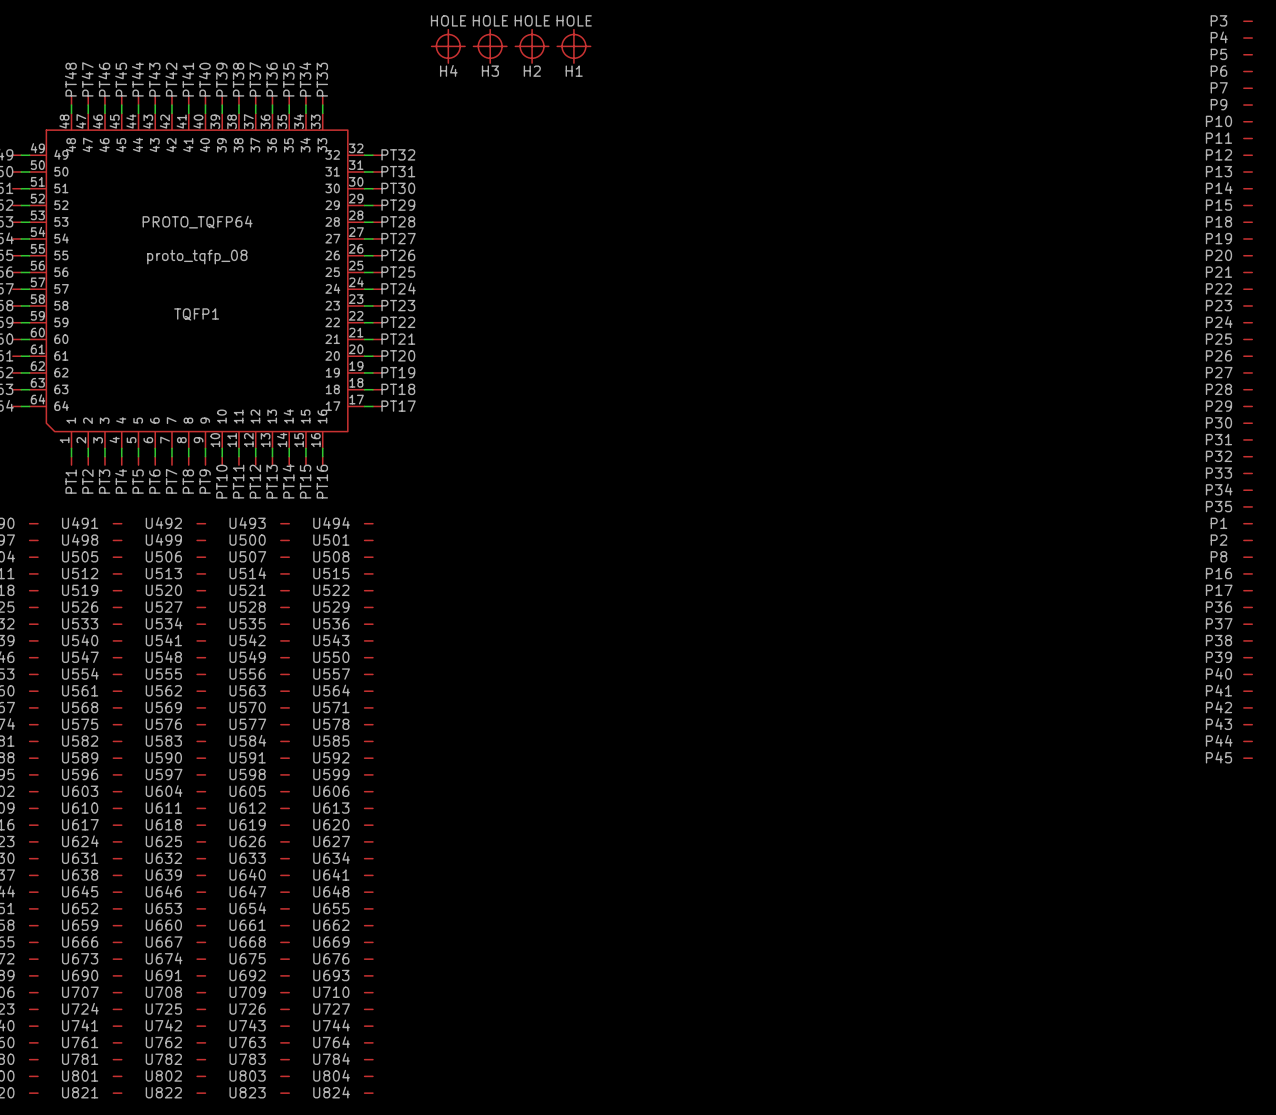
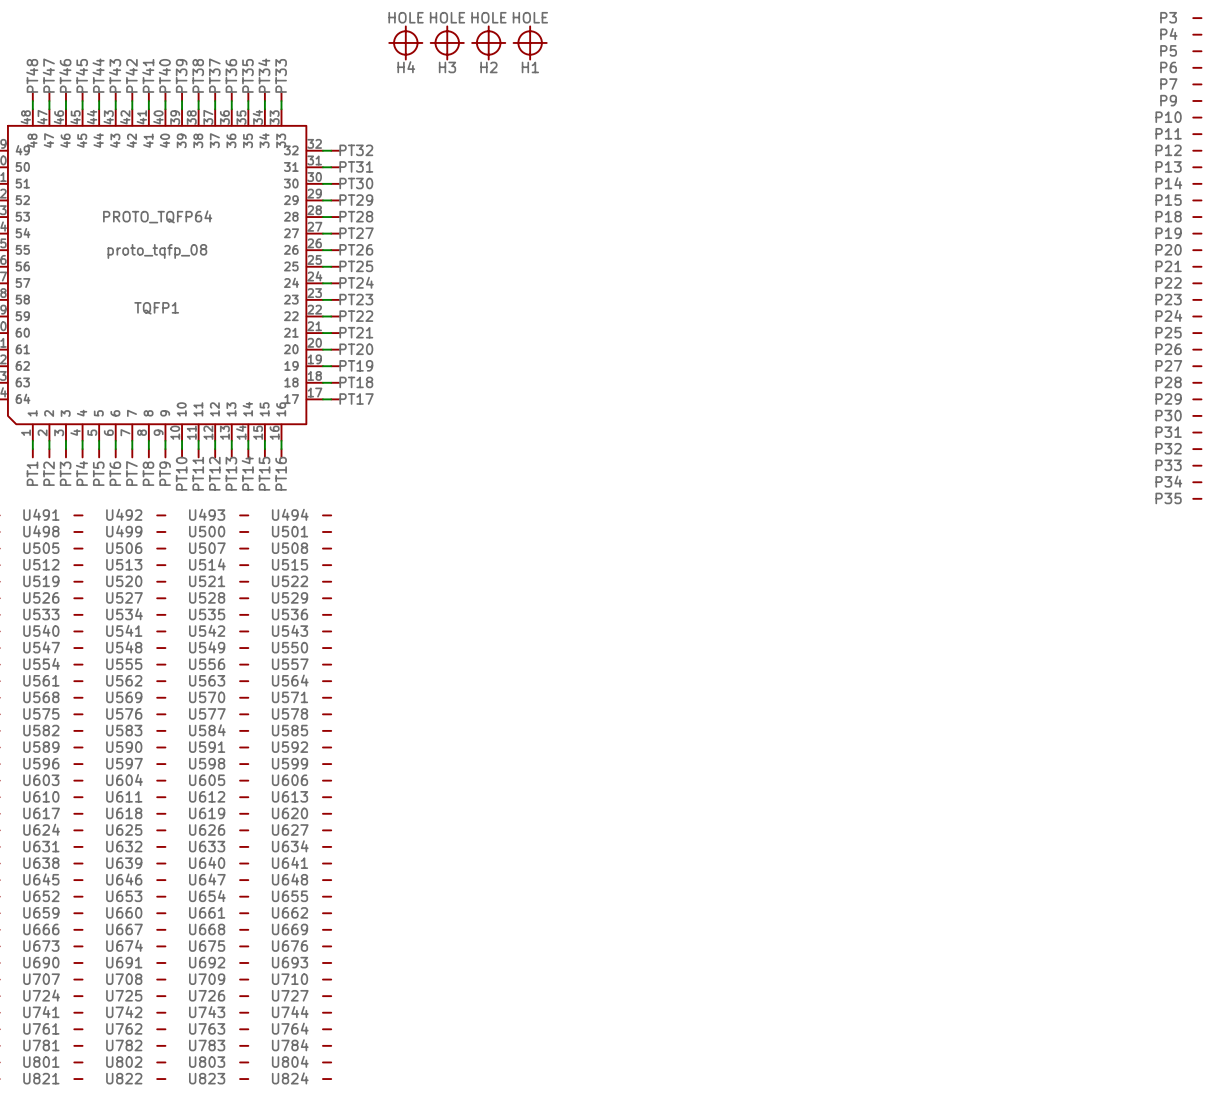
P1: (1248, 523) -> none
P2: (1248, 540) -> none
P8: (1248, 557) -> none
P16: (1248, 573) -> none
P17: (1248, 590) -> none
P36: (1248, 607) -> none
P37: (1248, 624) -> none
P38: (1248, 640) -> none
P39: (1248, 657) -> none
P40: (1248, 674) -> none
P41: (1248, 691) -> none
P42: (1248, 707) -> none
P43: (1248, 724) -> none
P44: (1248, 741) -> none
P45: (1248, 758) -> none

